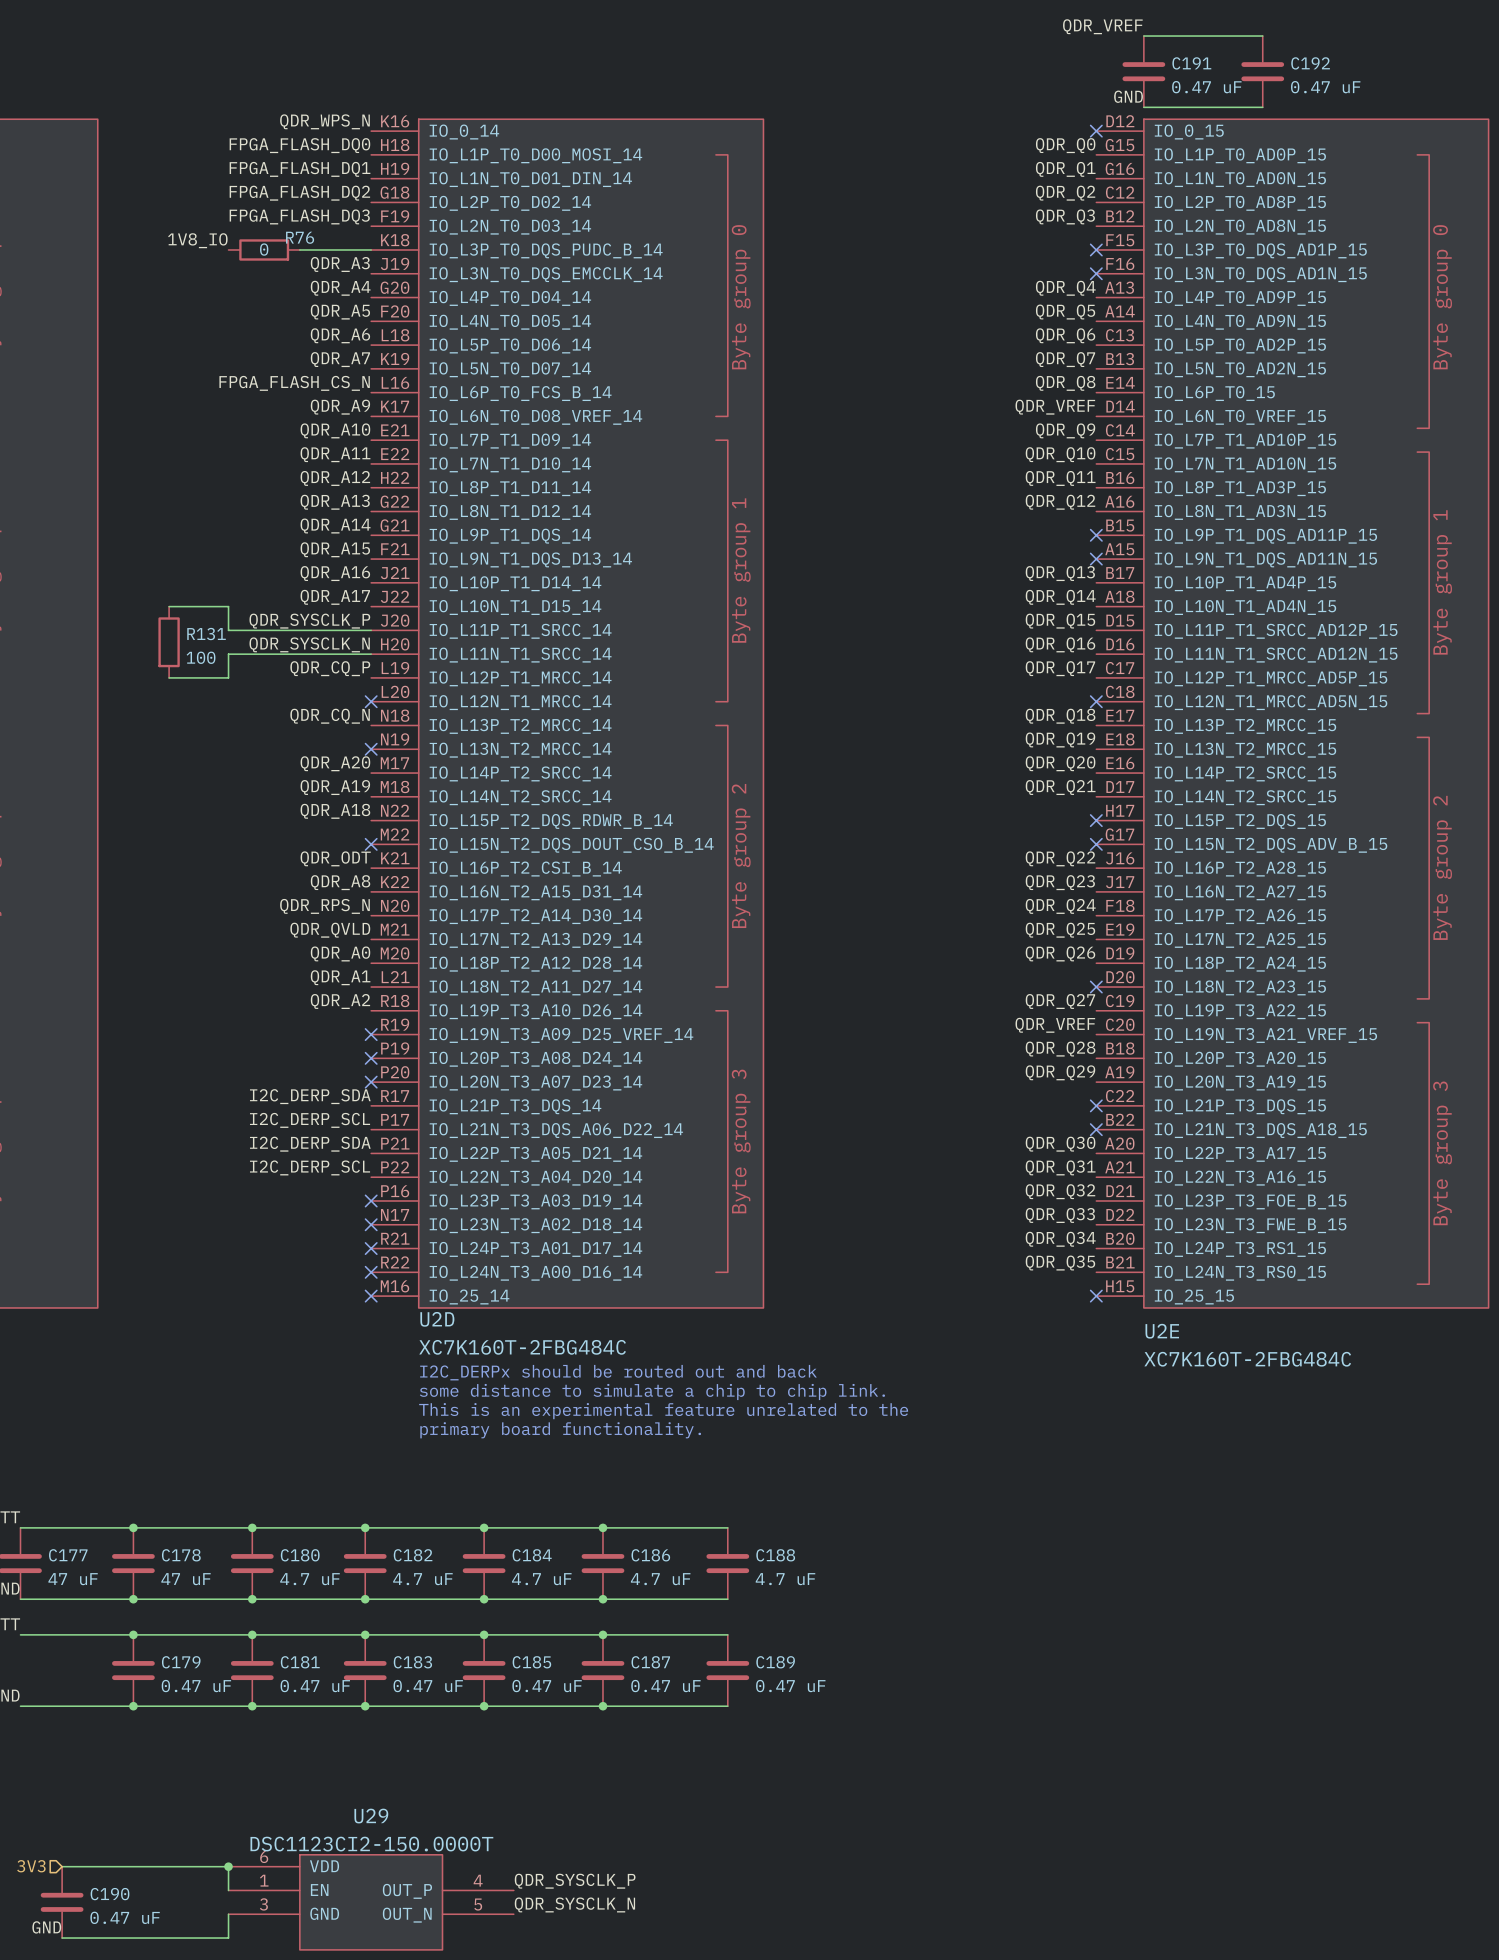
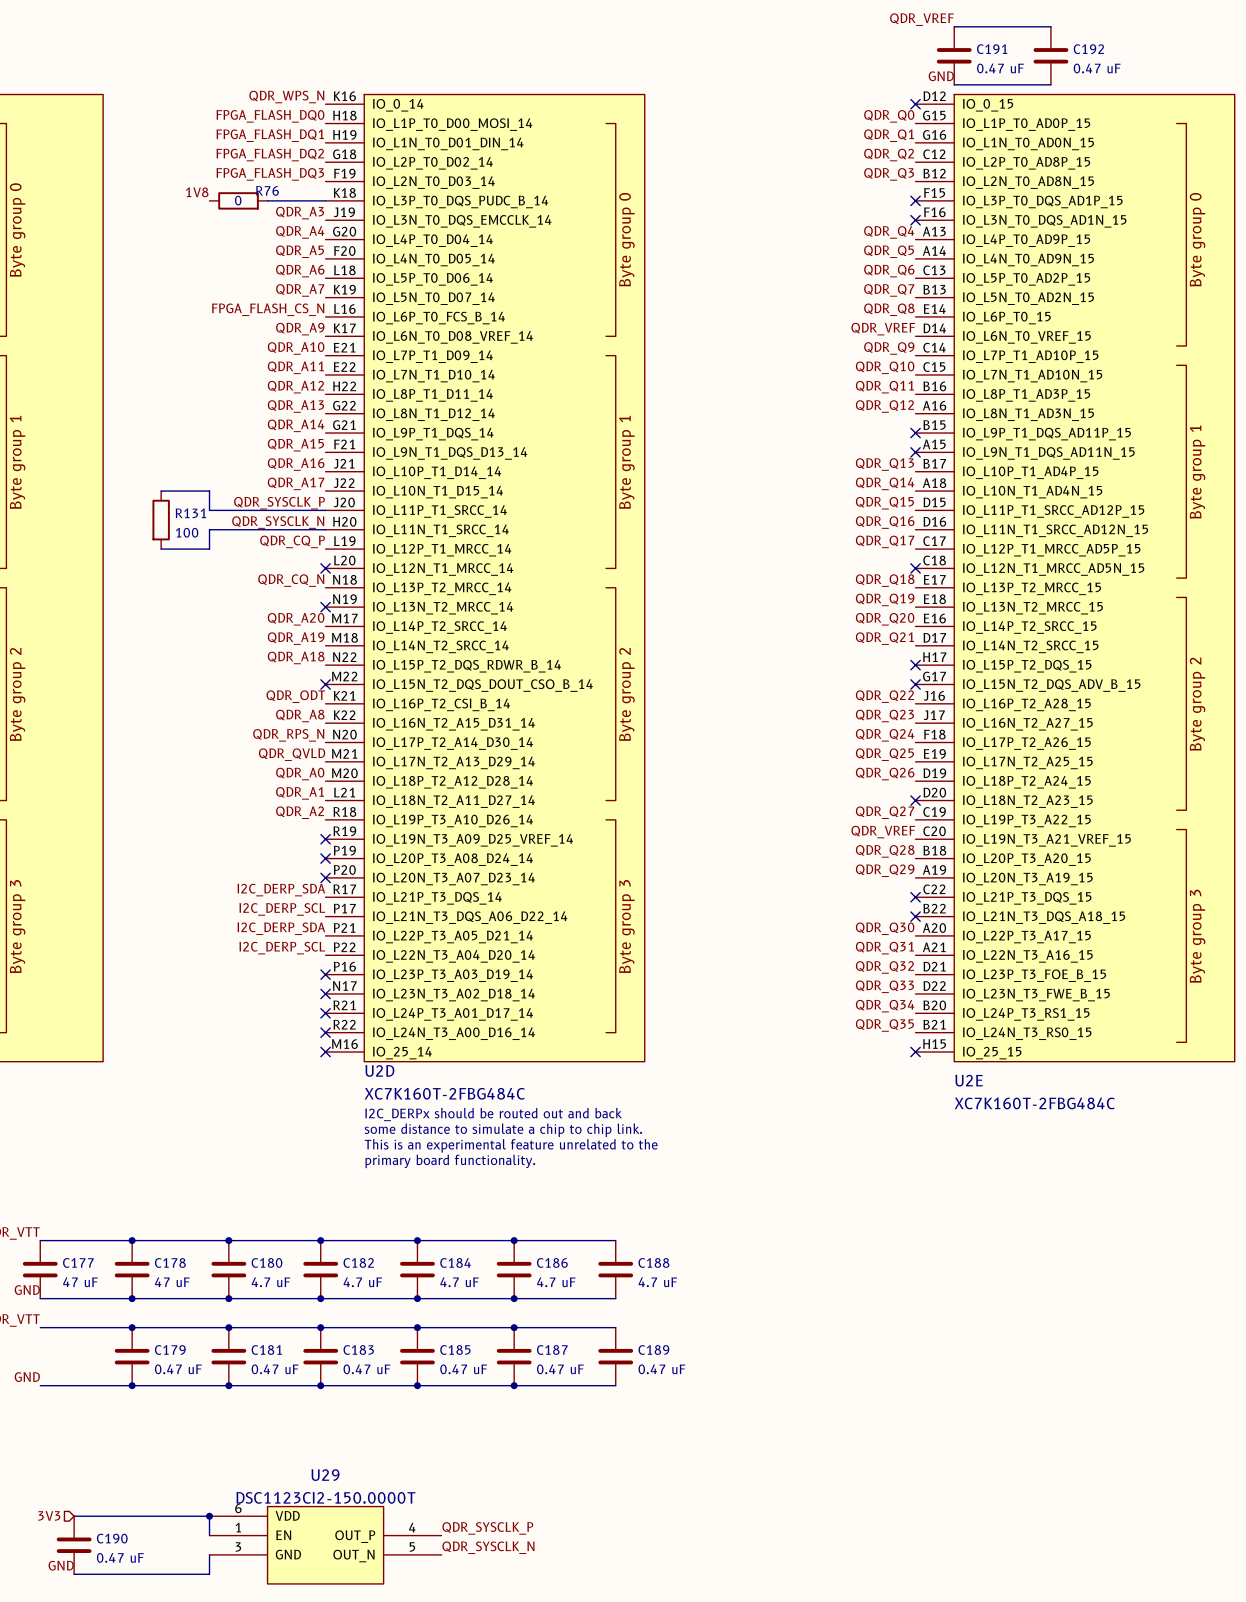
label: 1V8_IO (197, 240) -> 1V8 (197, 192)

